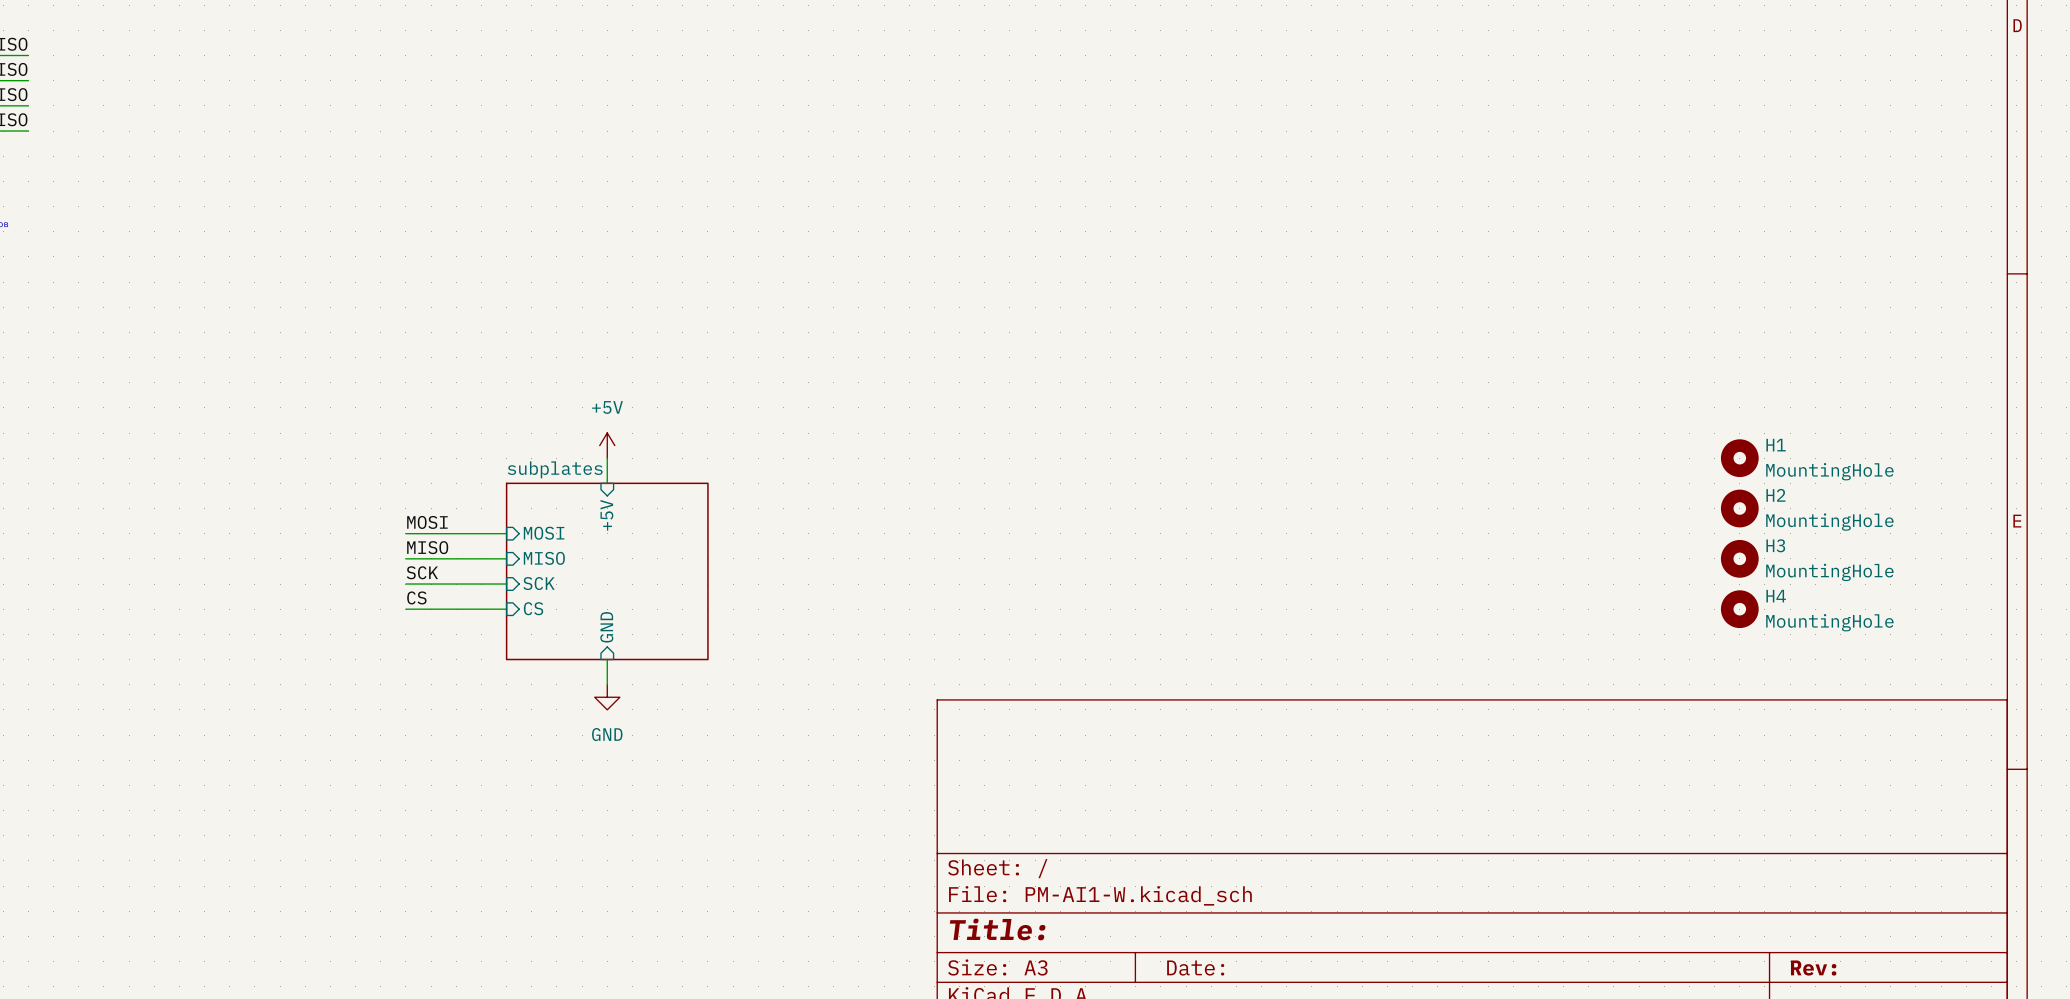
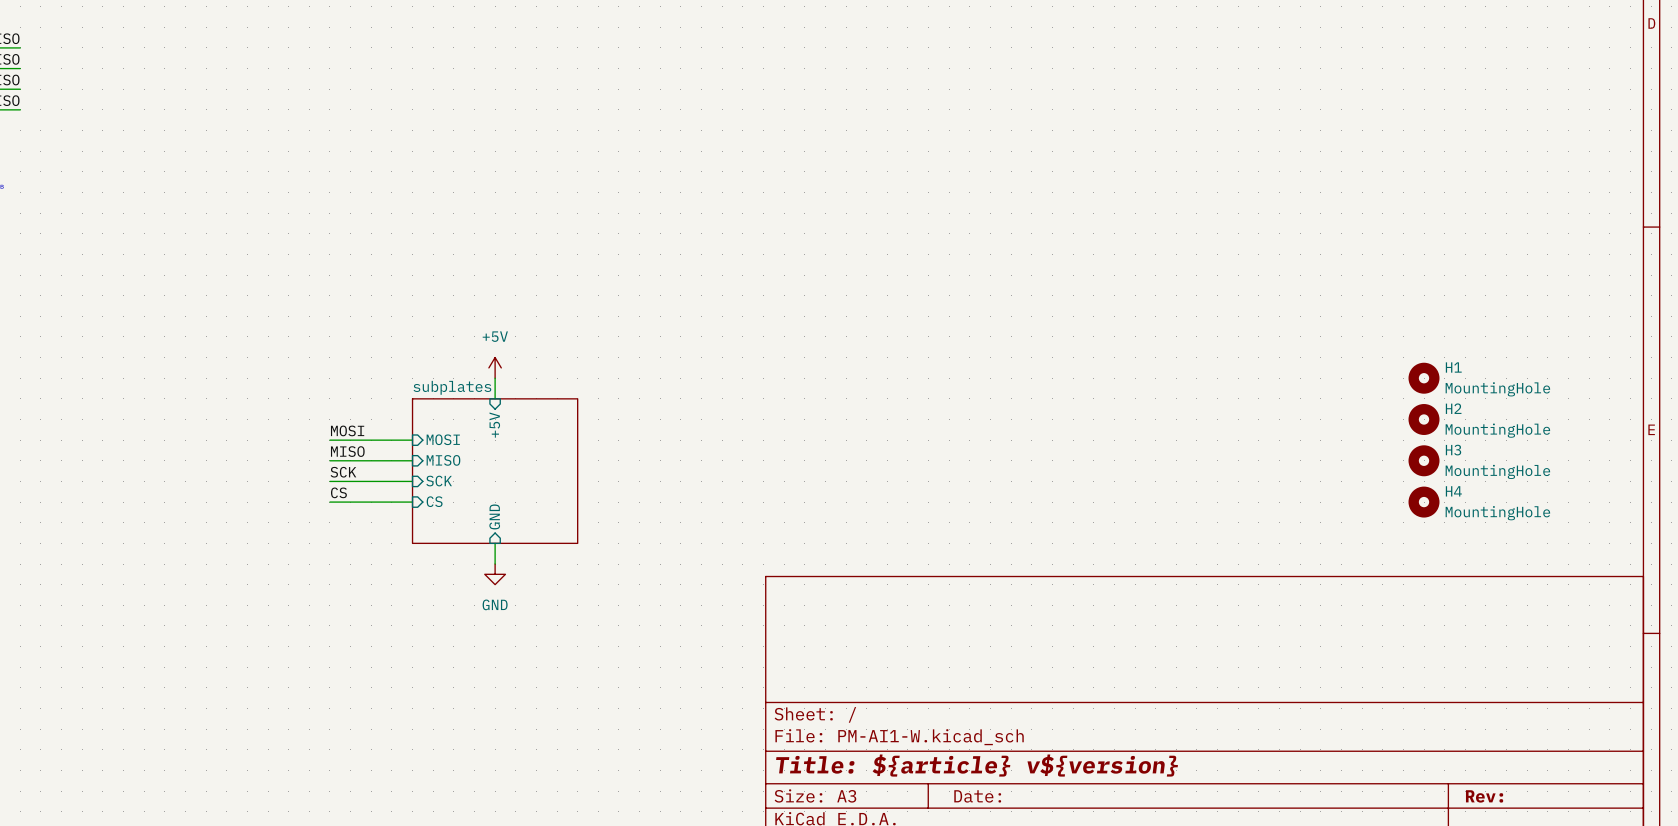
title block: Title: (997, 929) -> Title: ${article} v${version} (977, 765)

